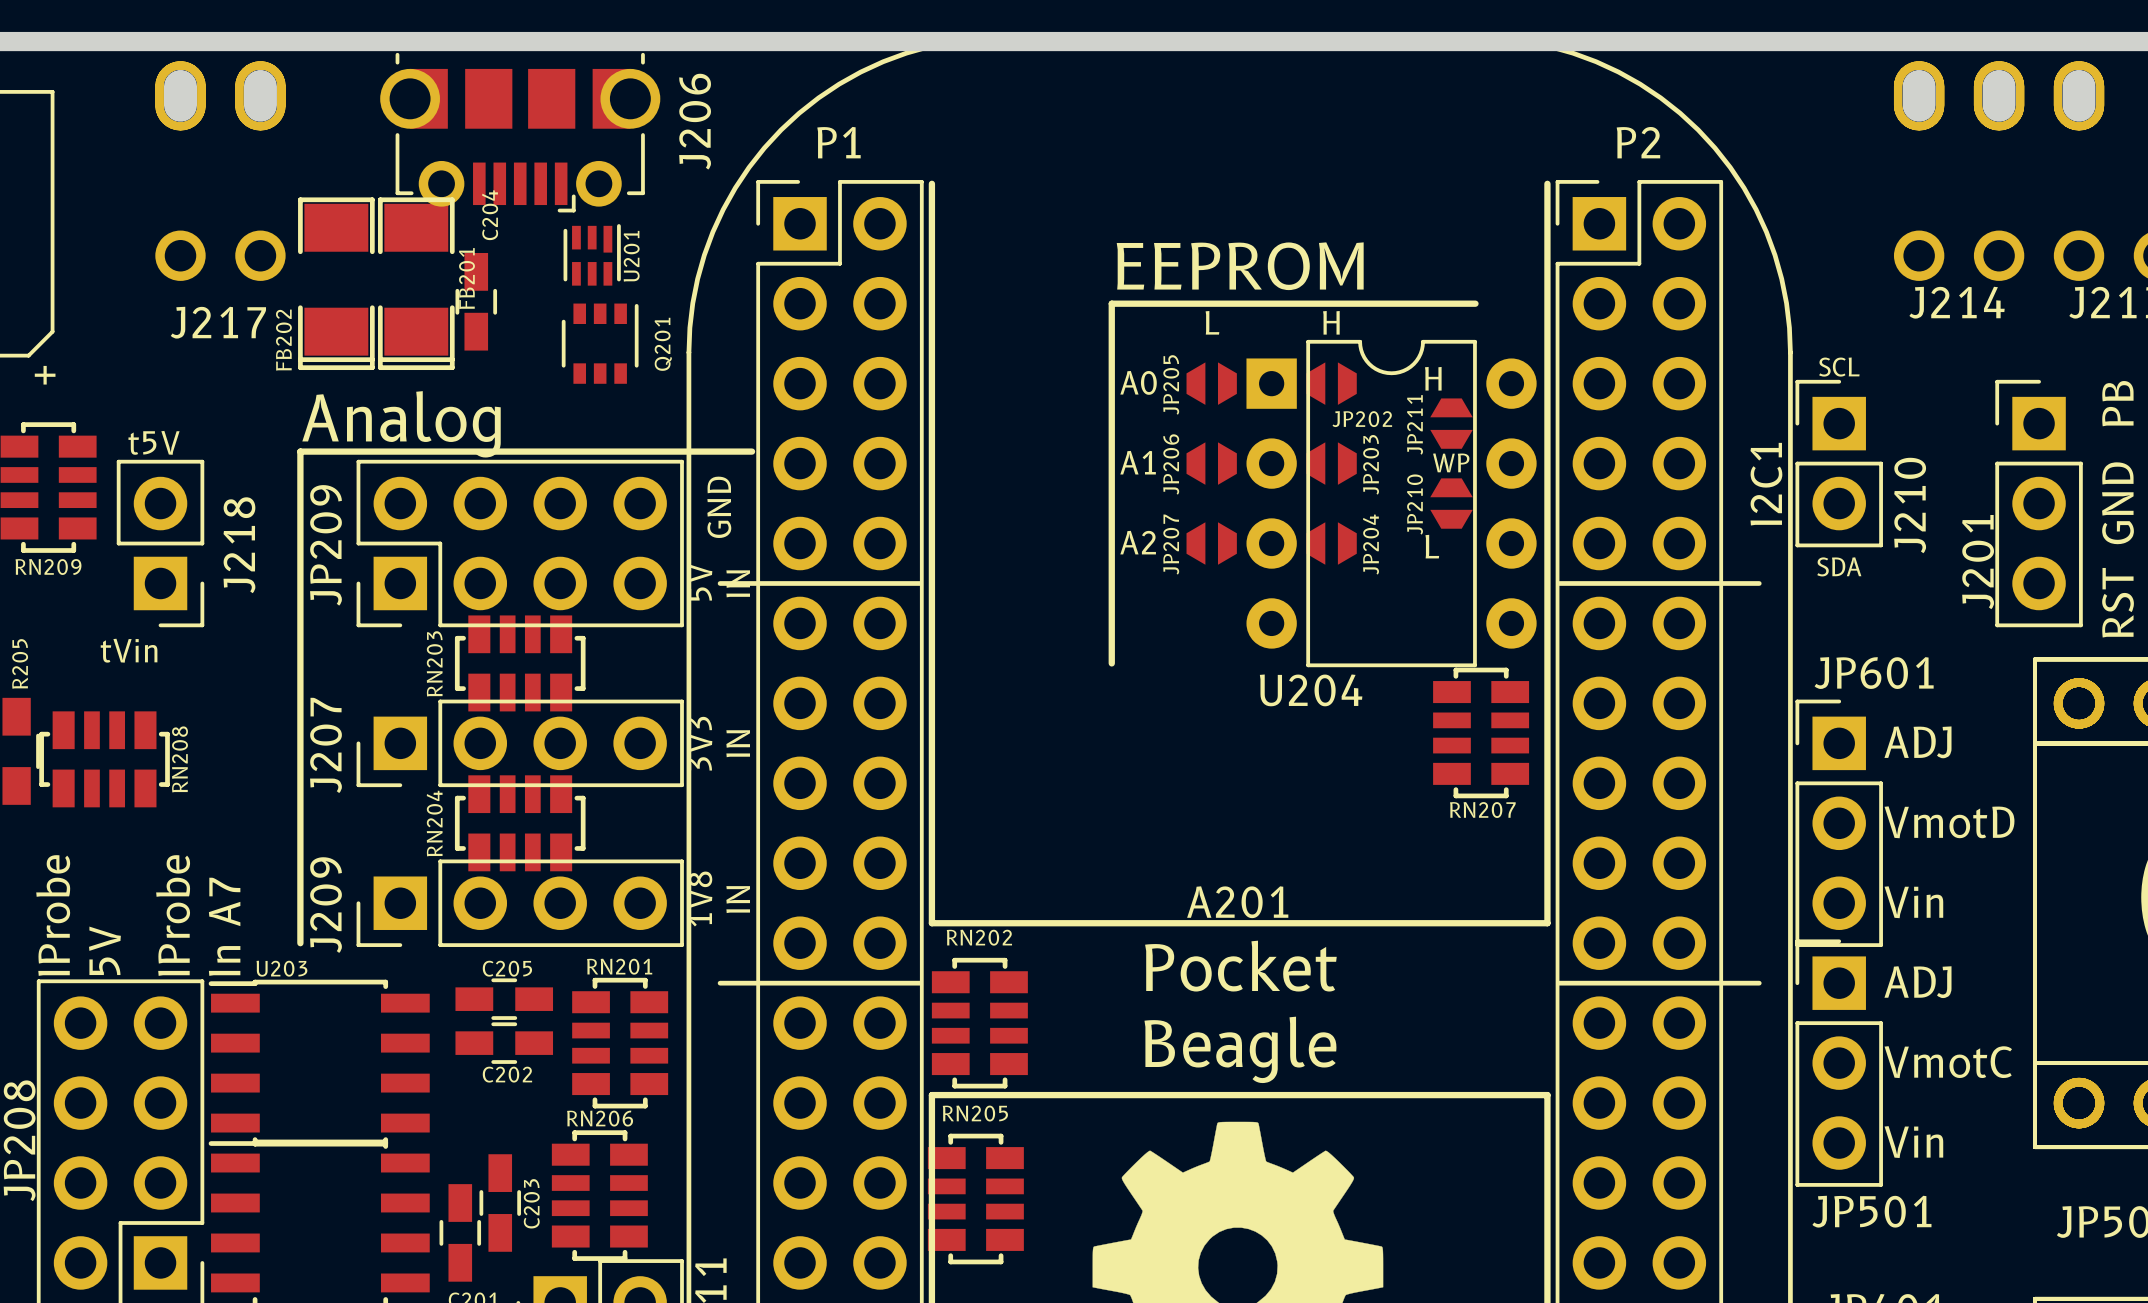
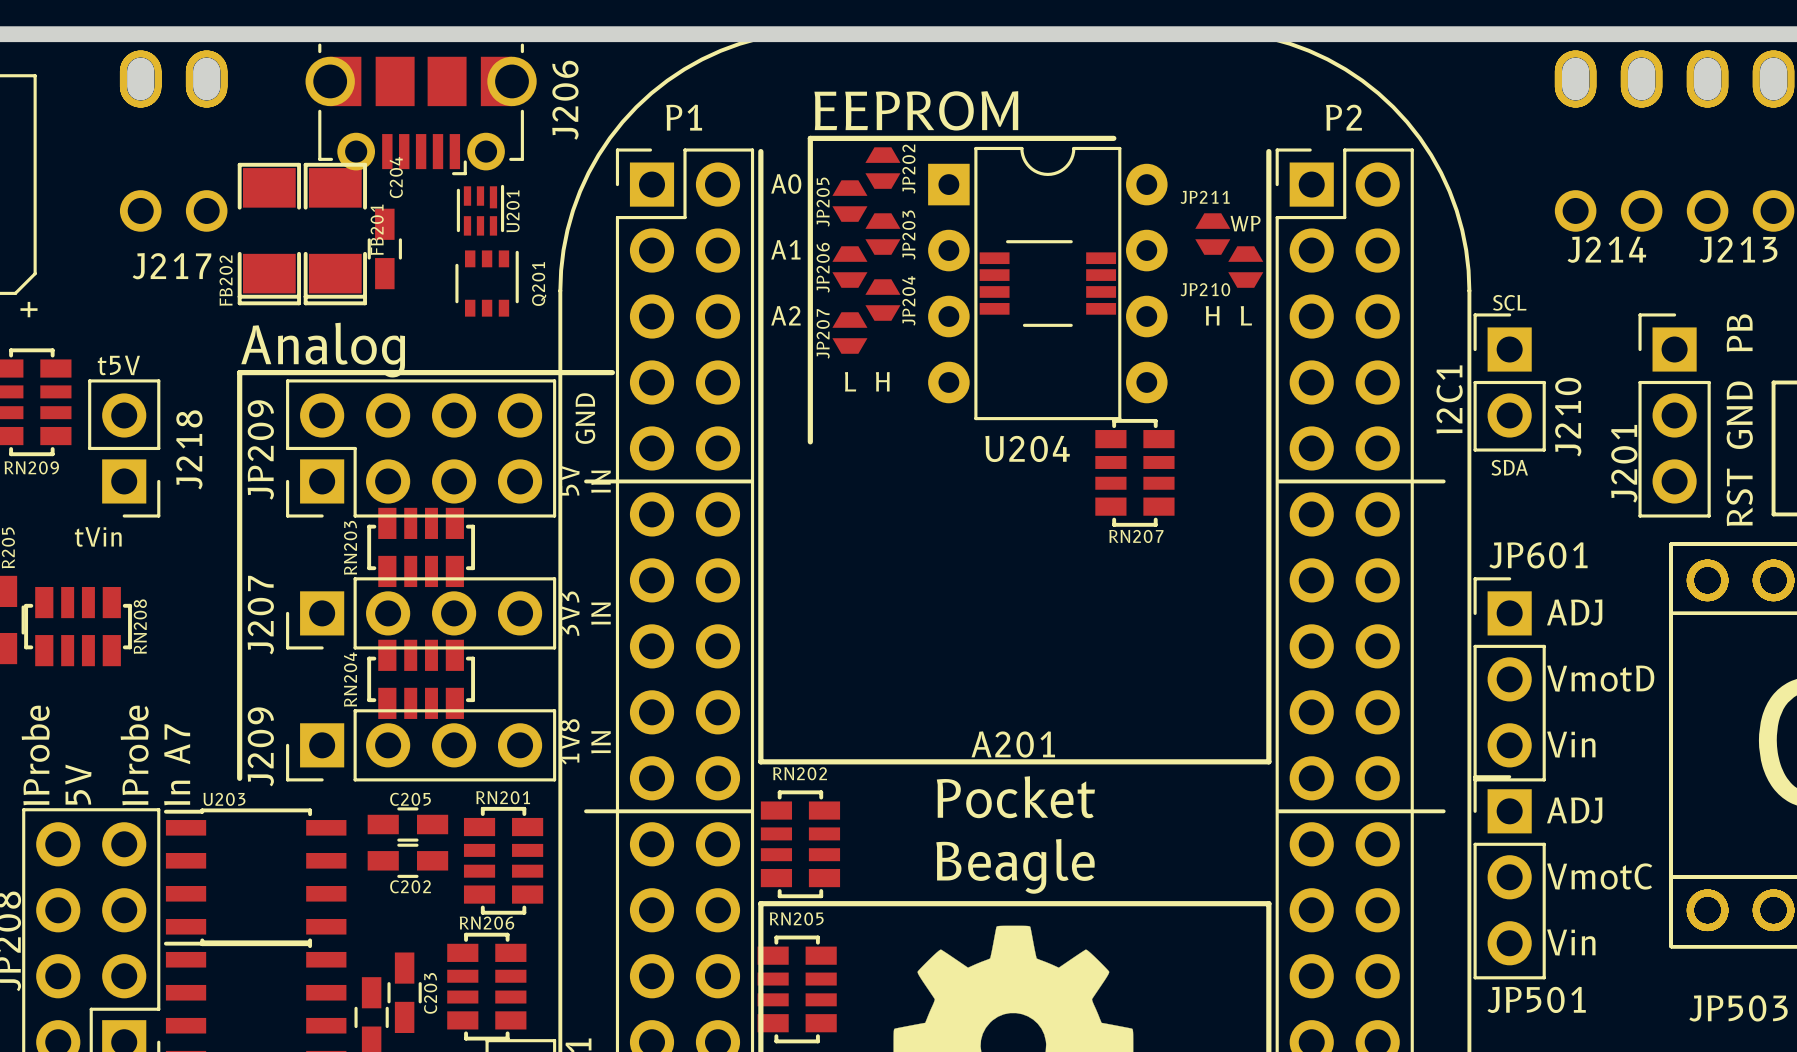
line: none -> (1113, 138) (810, 138) (810, 441)
text position: EEPROM (1240, 266) -> EEPROM (916, 110)
line: (1475, 303) (1111, 303) (1111, 663) -> none
text: L (1212, 322) -> none
text: H (1331, 322) -> none
U204 footprint: [1246, 339, 1537, 668] -> [928, 146, 1168, 421]
text position: H (1433, 378) -> H (1212, 315)
text position: A0 (1138, 382) -> A0 (786, 183)
text: none -> L (1246, 315)
JP205 rotation: 0° (1211, 383) -> 90° clockwise (849, 201)
JP205 position: (1211, 383) -> (849, 201)
JP202 rotation: 0° (1331, 383) -> 90° clockwise (882, 168)
JP202 position: (1331, 383) -> (882, 168)
JP211 position: (1451, 423) -> (1212, 234)
JP211 name rotation: 0° (1415, 424) -> 90° clockwise (1205, 197)
text: none -> L (850, 381)
text: none -> H (882, 381)
text position: A1 (1138, 462) -> A1 (785, 249)
text position: WP (1451, 462) -> WP (1245, 223)
JP206 rotation: 0° (1211, 463) -> 90° clockwise (849, 267)
JP206 position: (1211, 463) -> (849, 267)
JP203 rotation: 0° (1331, 463) -> 90° clockwise (882, 234)
JP203 position: (1331, 463) -> (882, 234)
JP210 position: (1451, 503) -> (1245, 267)
JP210 name rotation: 0° (1415, 504) -> 90° clockwise (1205, 289)
text position: A2 (1138, 542) -> A2 (785, 315)
JP207 rotation: 0° (1211, 543) -> 90° clockwise (849, 333)
JP207 position: (1211, 543) -> (849, 333)
JP204 rotation: 0° (1331, 543) -> 90° clockwise (882, 300)
JP204 position: (1331, 543) -> (882, 300)
text: L (1432, 546) -> none
RN207 position: (1481, 732) -> (1134, 472)

